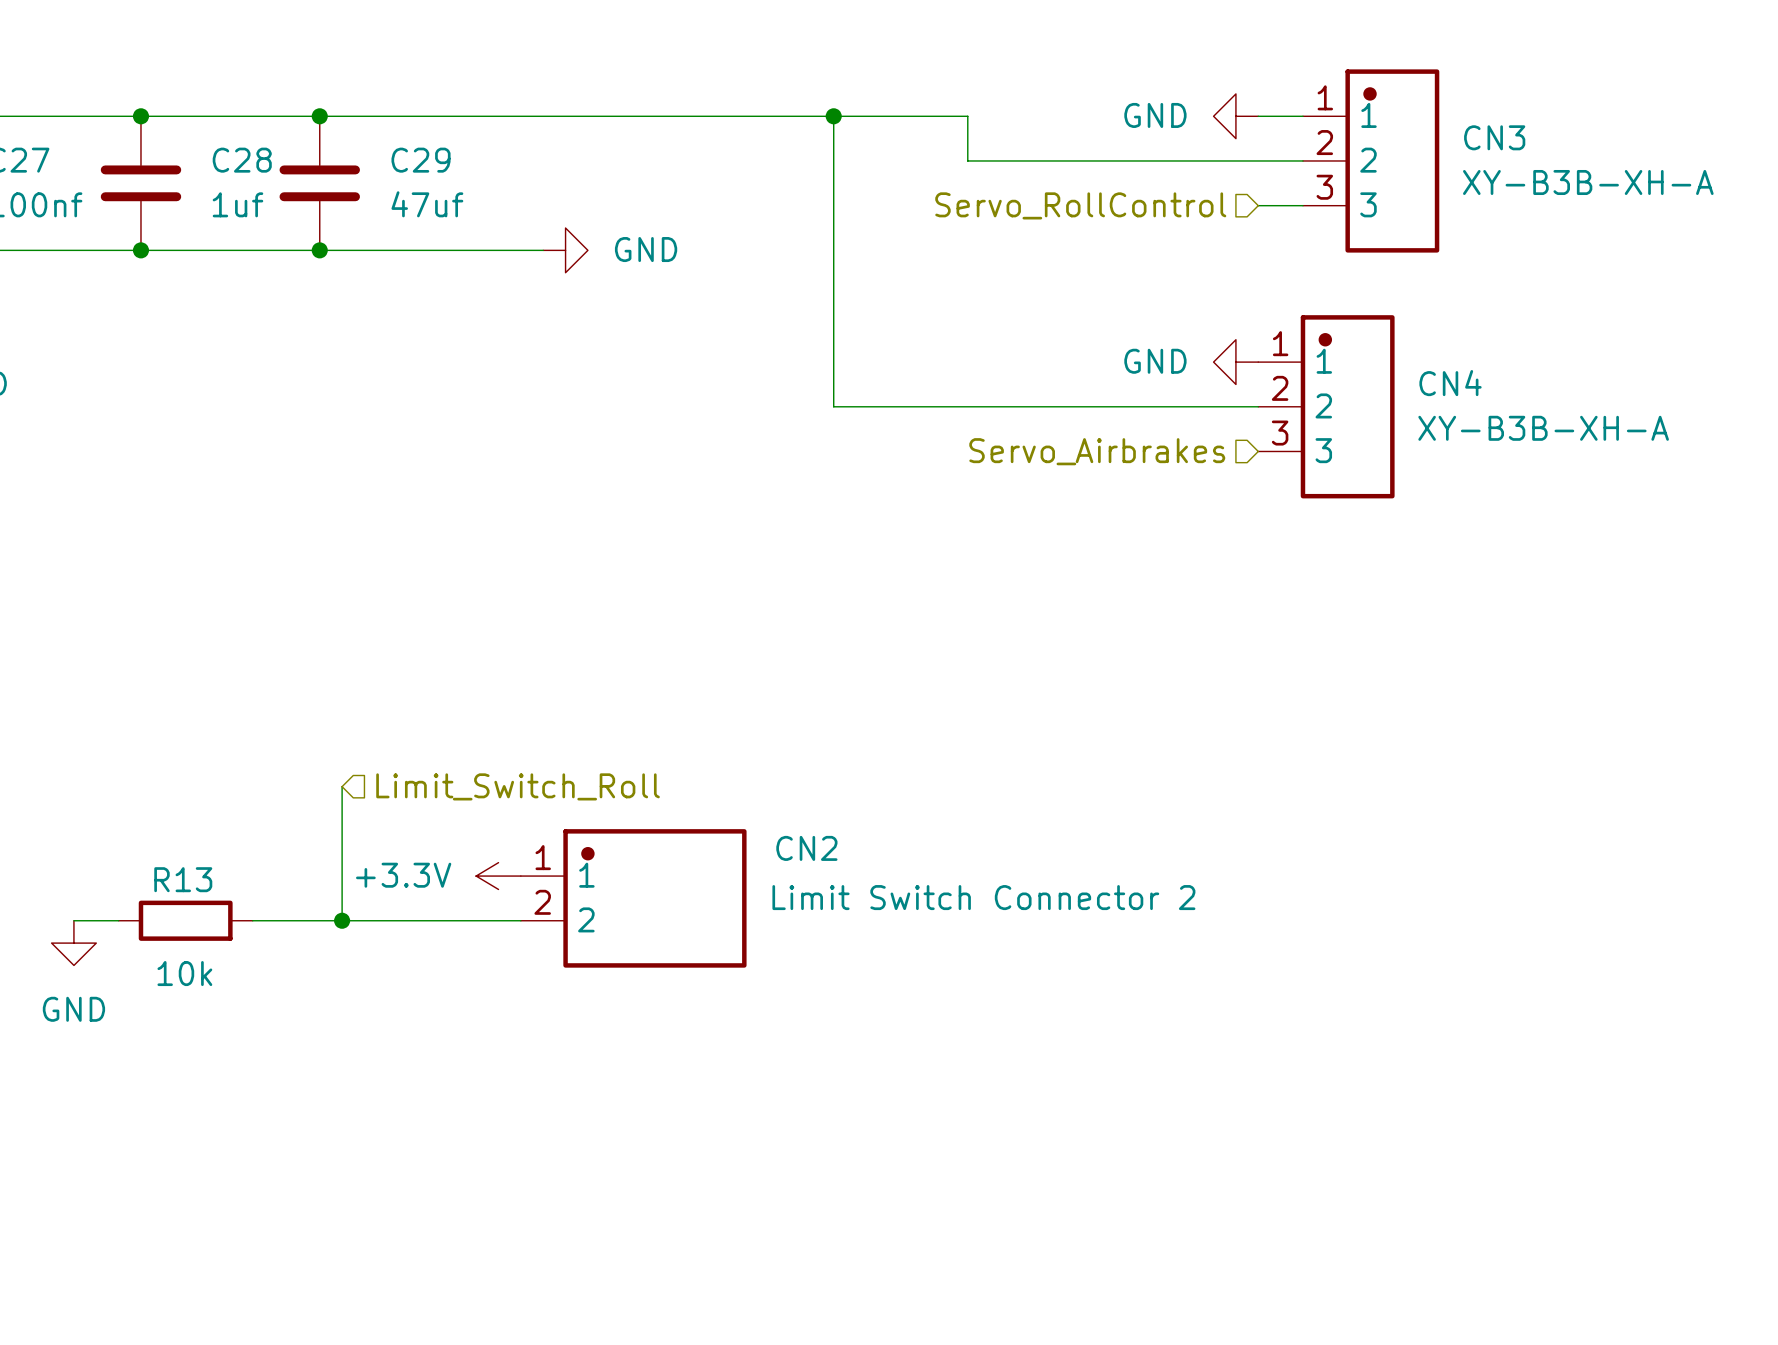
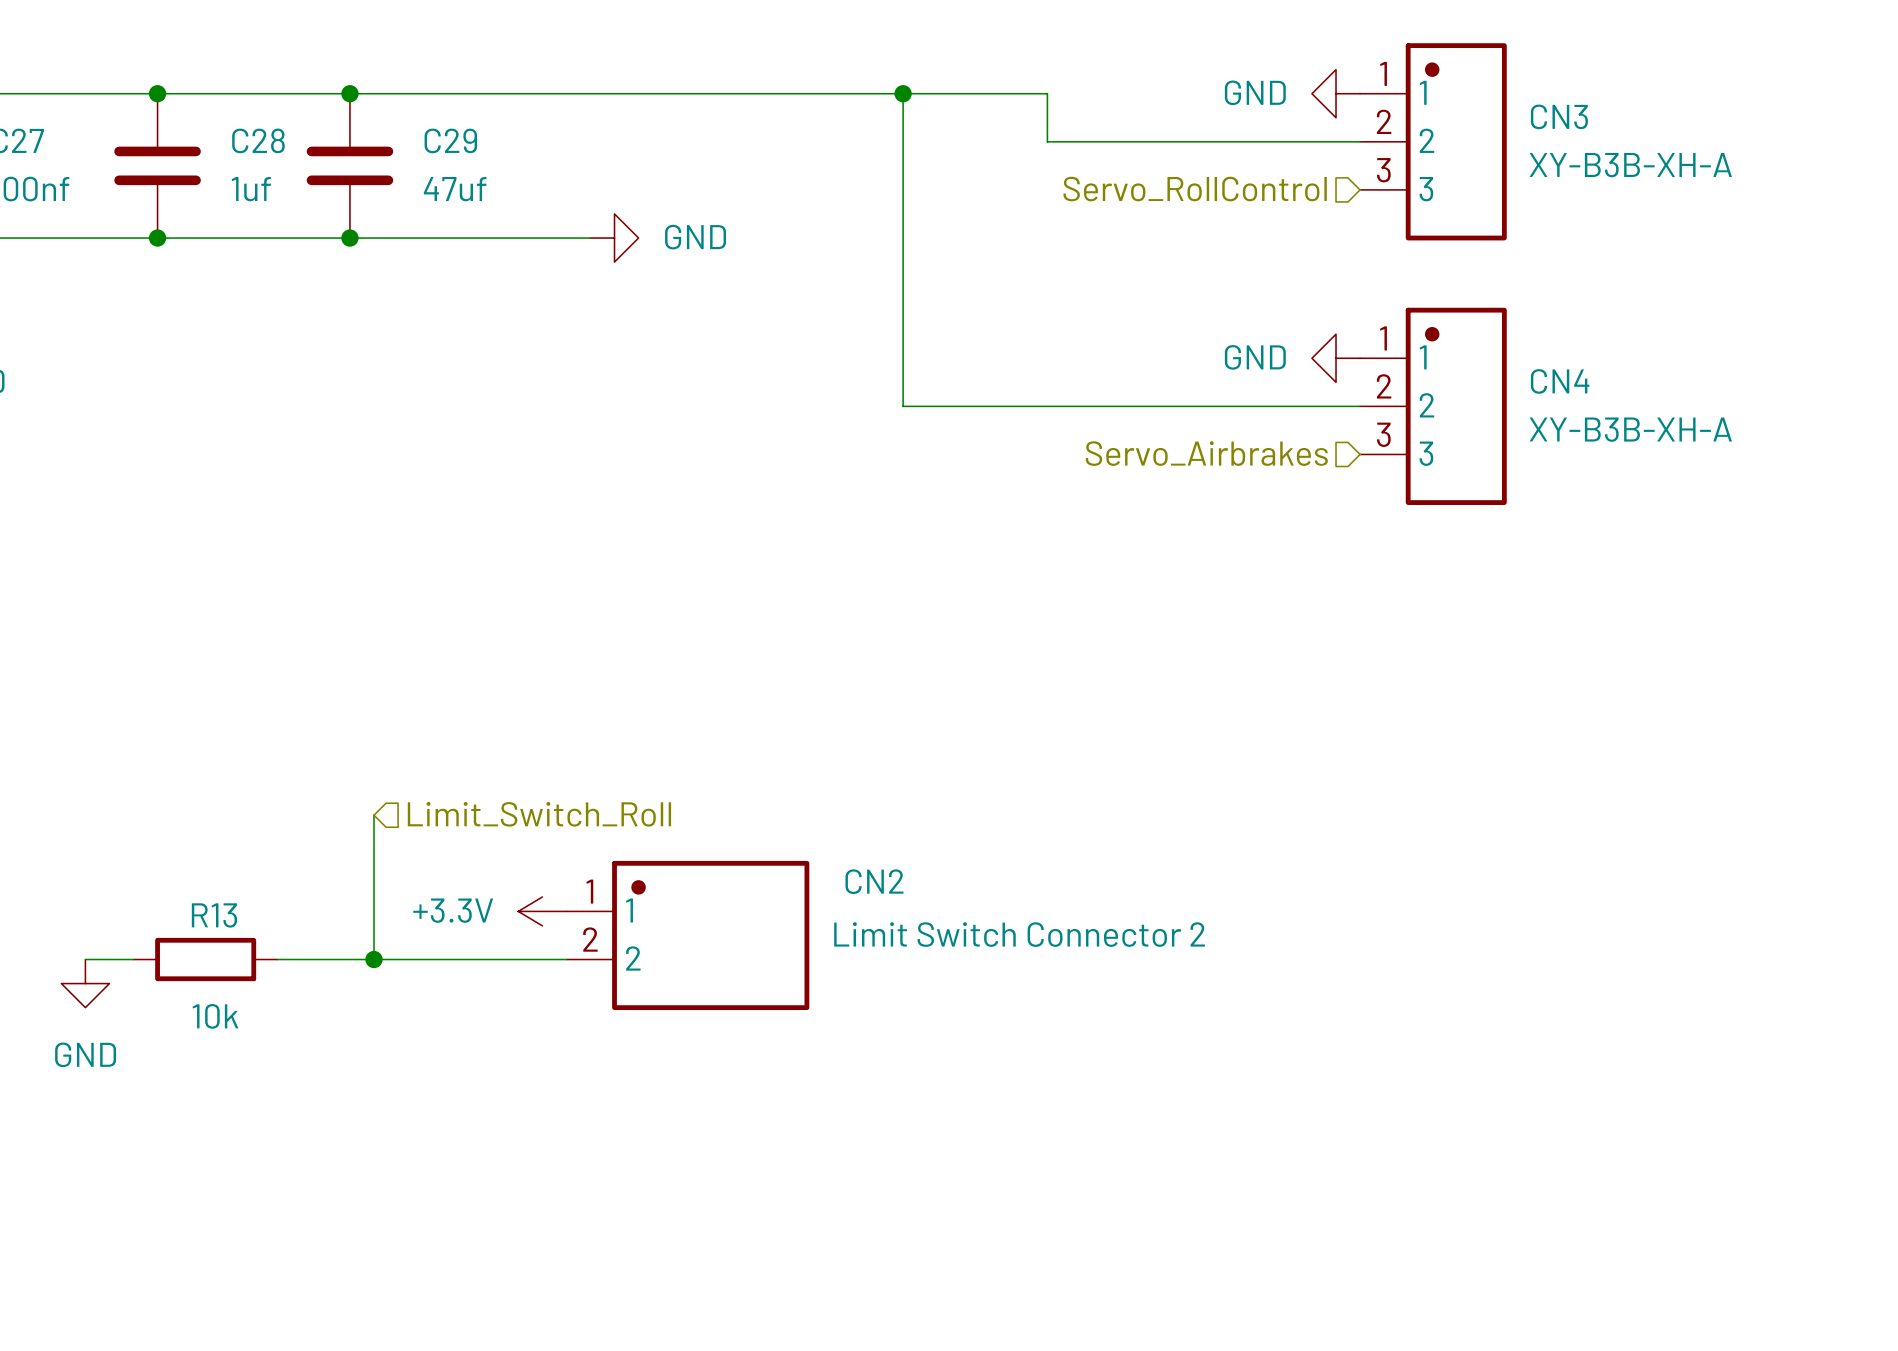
CN3 position: (1371, 160) -> (1433, 141)

